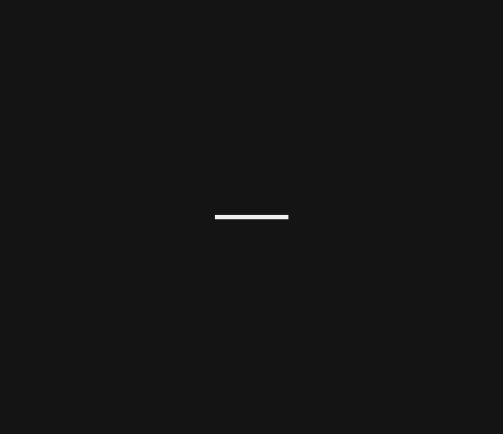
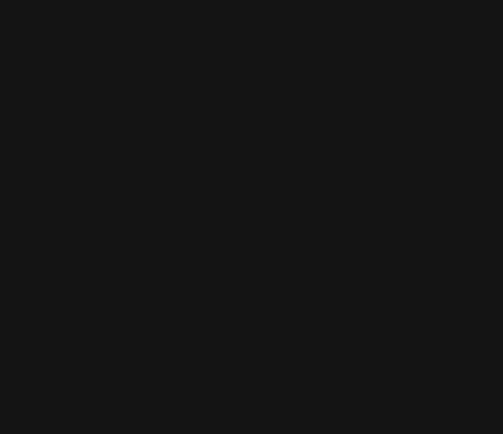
drawing: [214, 214, 289, 220] -> none

